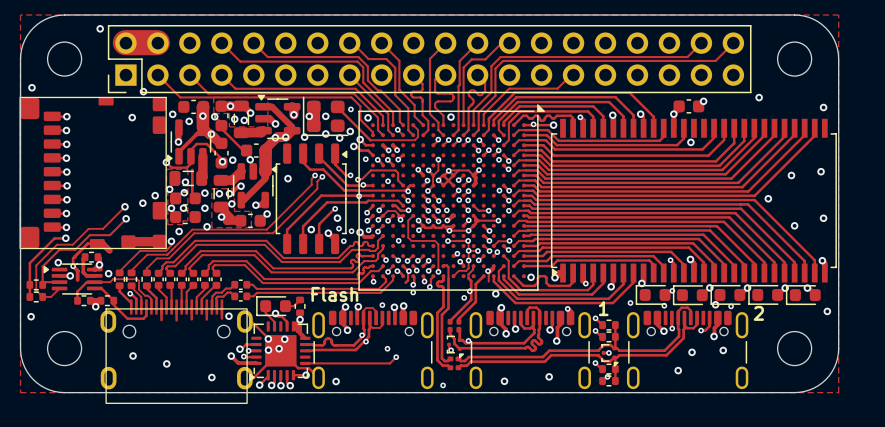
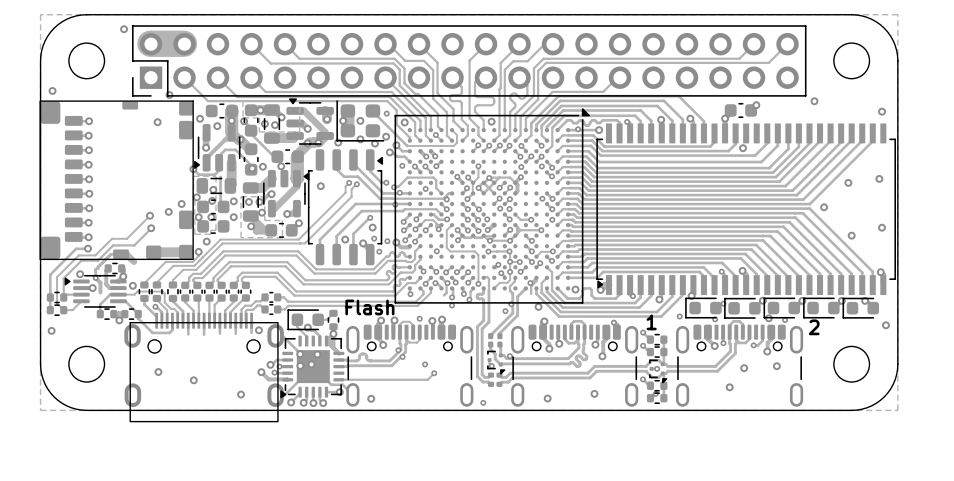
via: (207, 226) -> none

